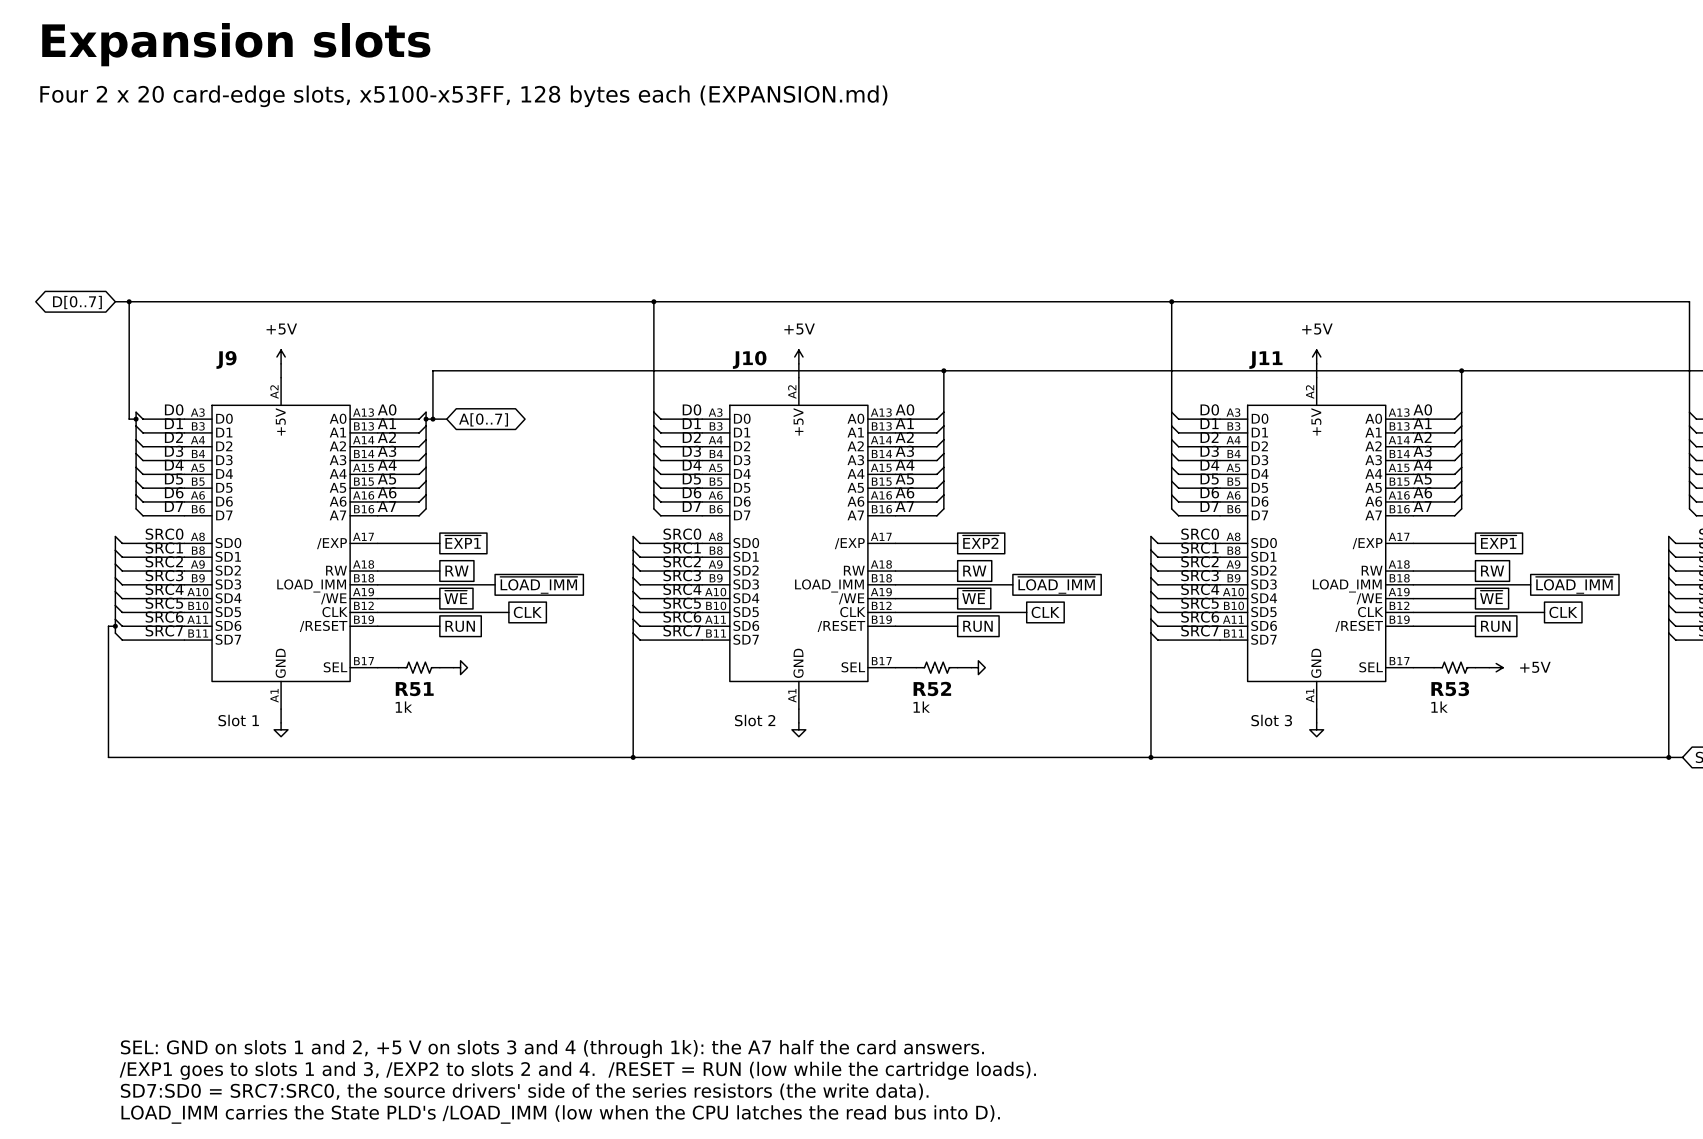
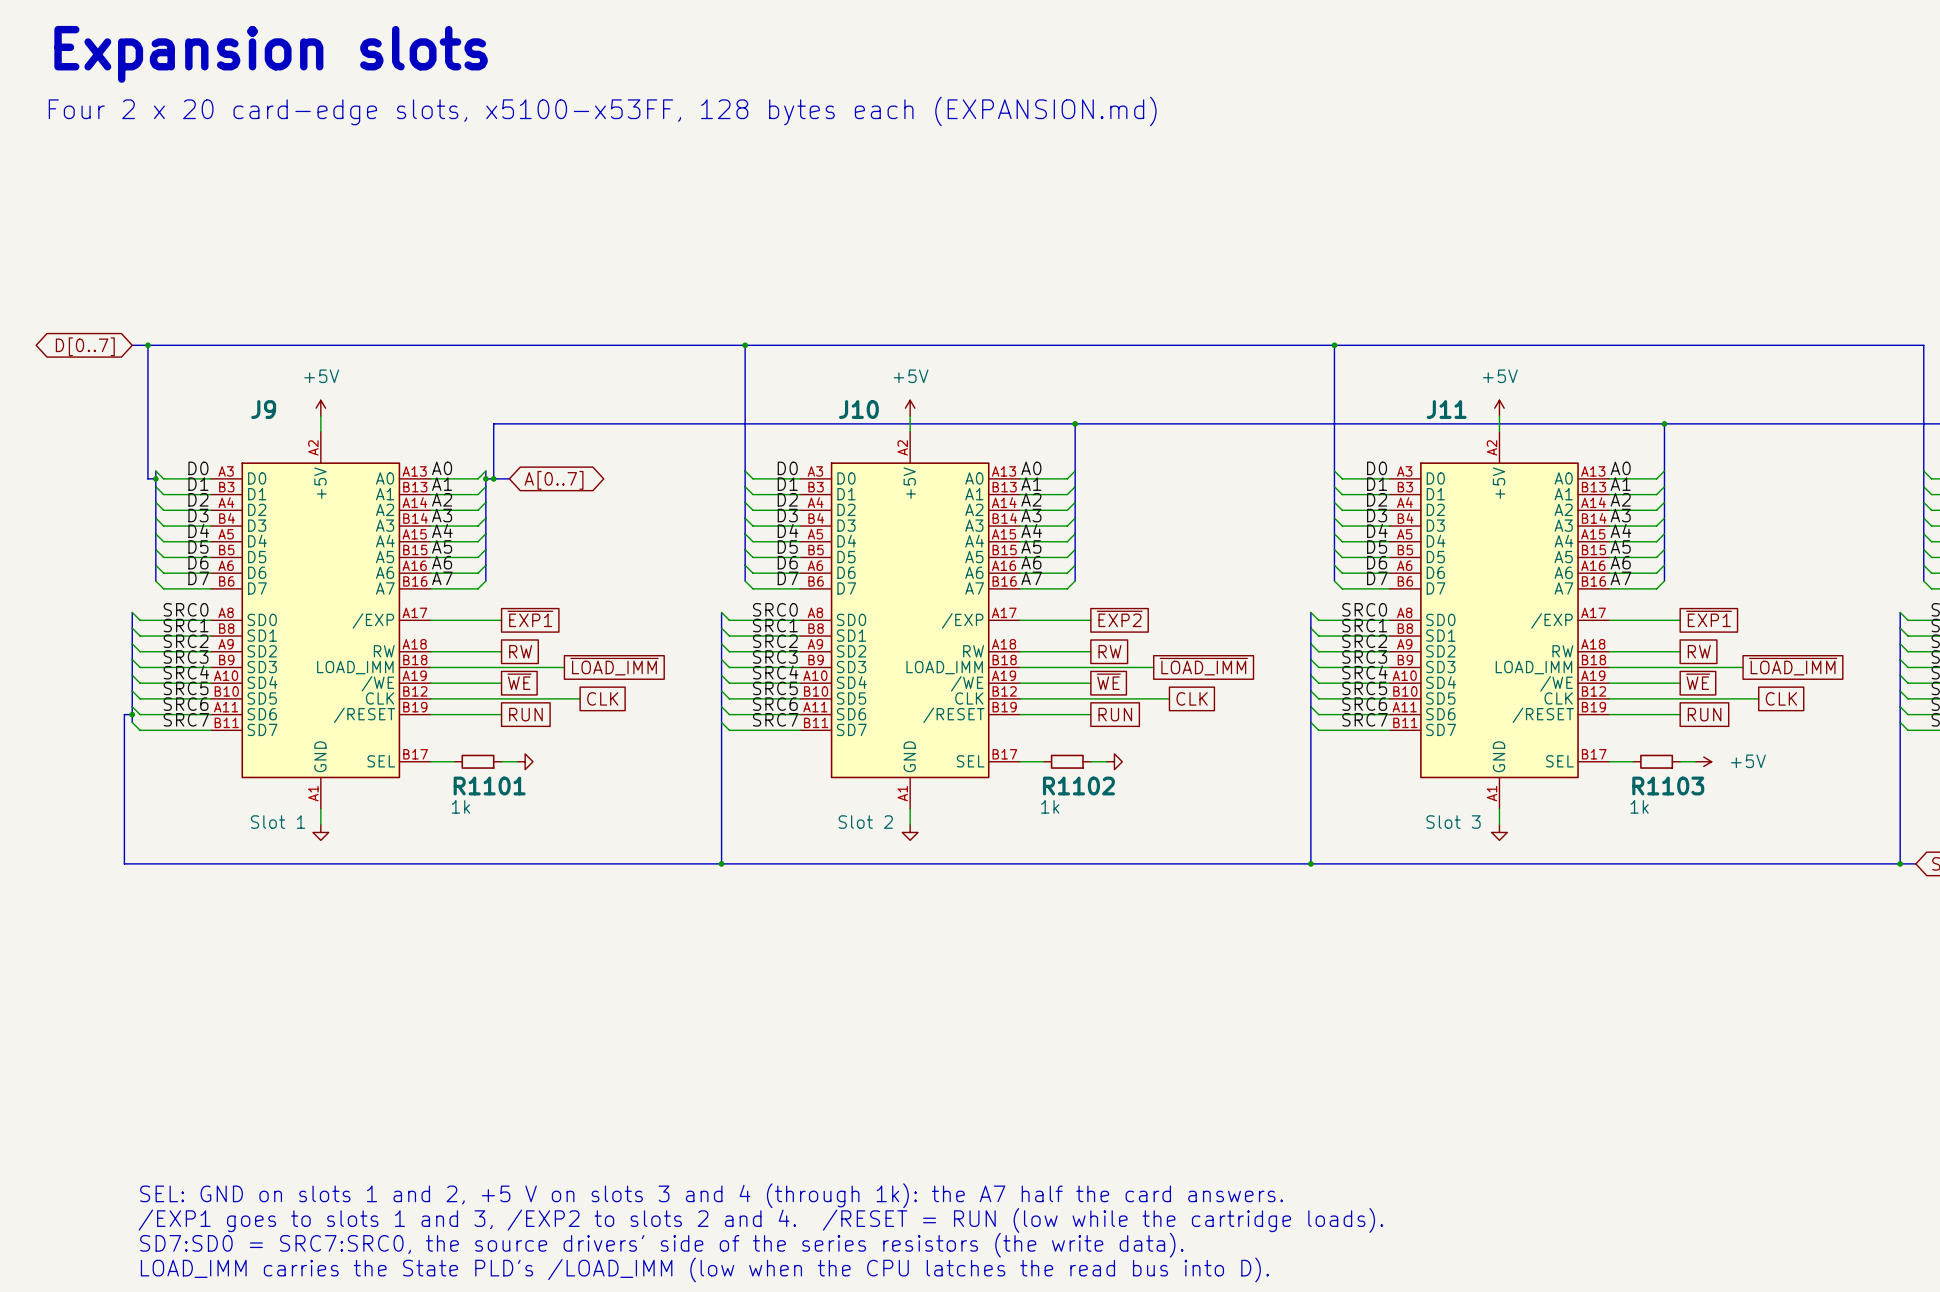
R51: 1k (419, 667) -> none
R1101: none -> 1k (477, 761)
R52: 1k (936, 667) -> none
R1102: none -> 1k (1067, 761)
R53: 1k (1454, 667) -> none
R1103: none -> 1k (1656, 761)

